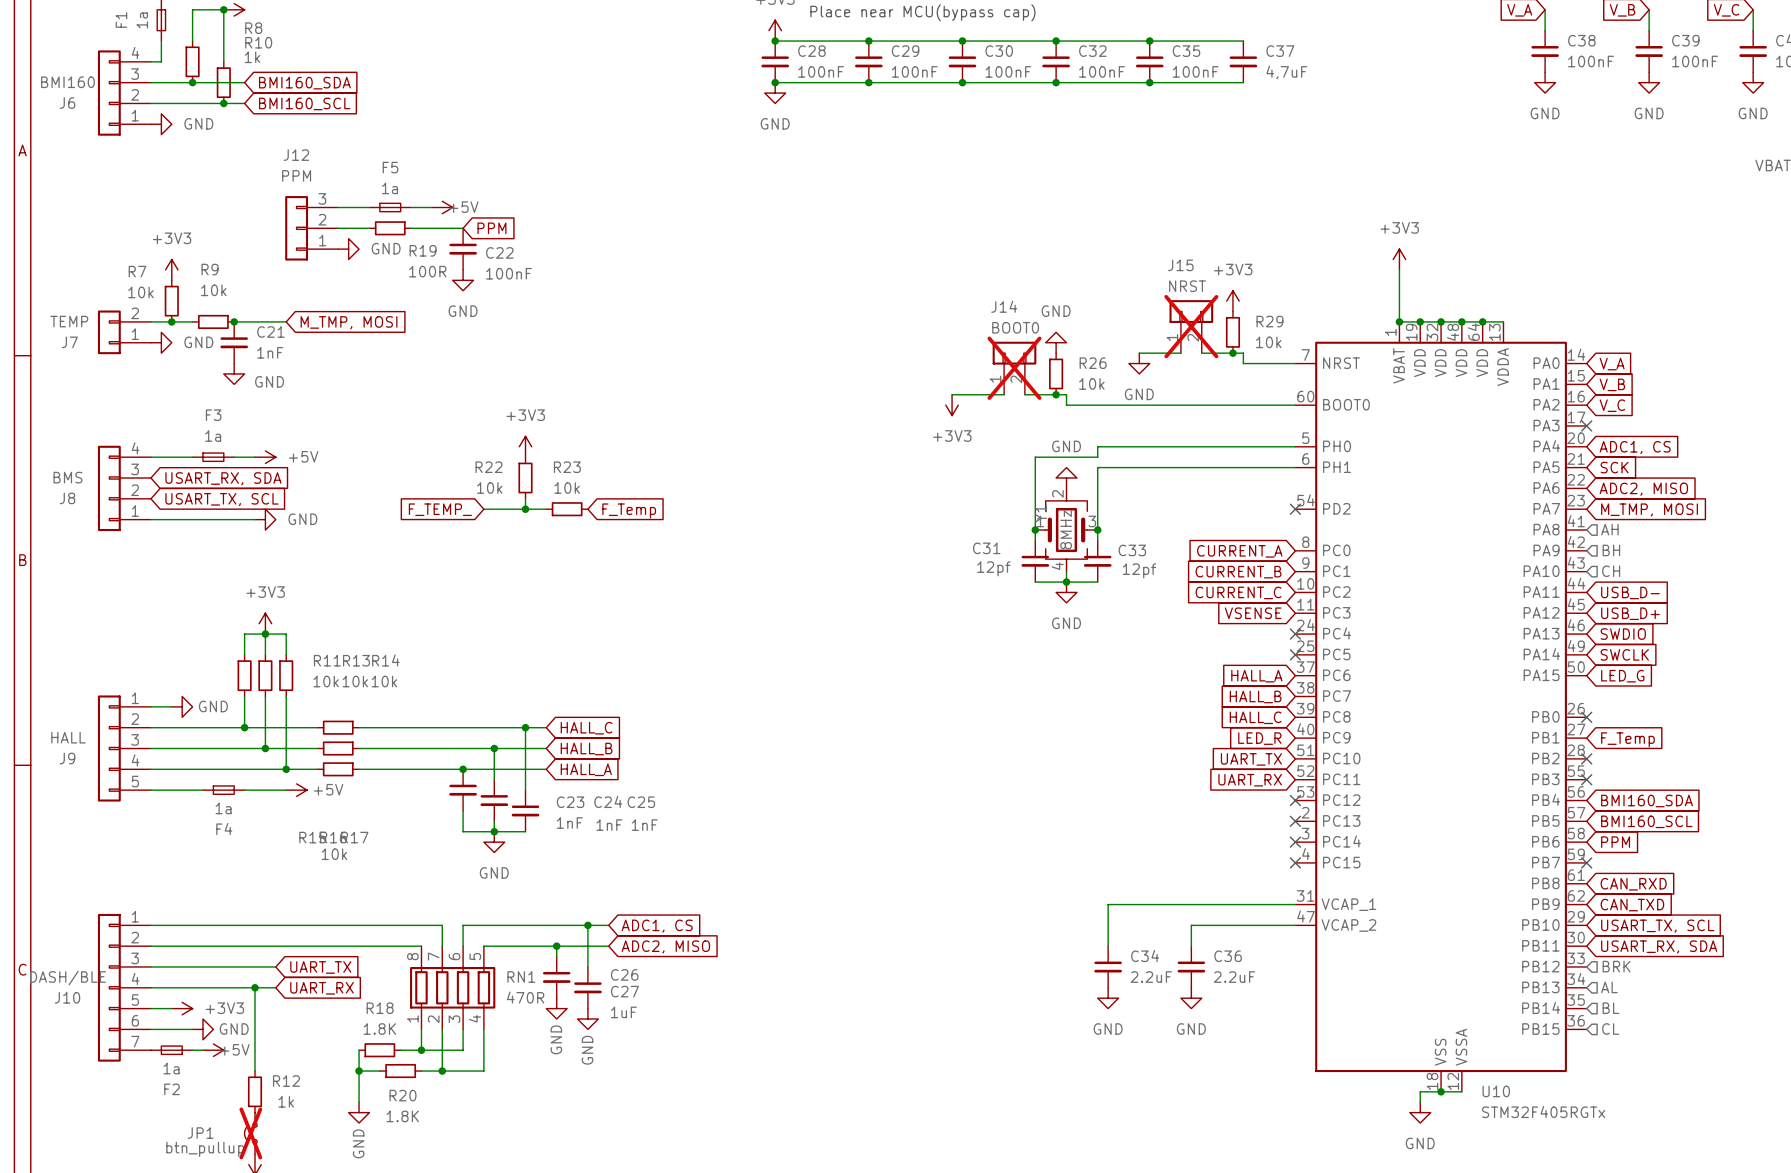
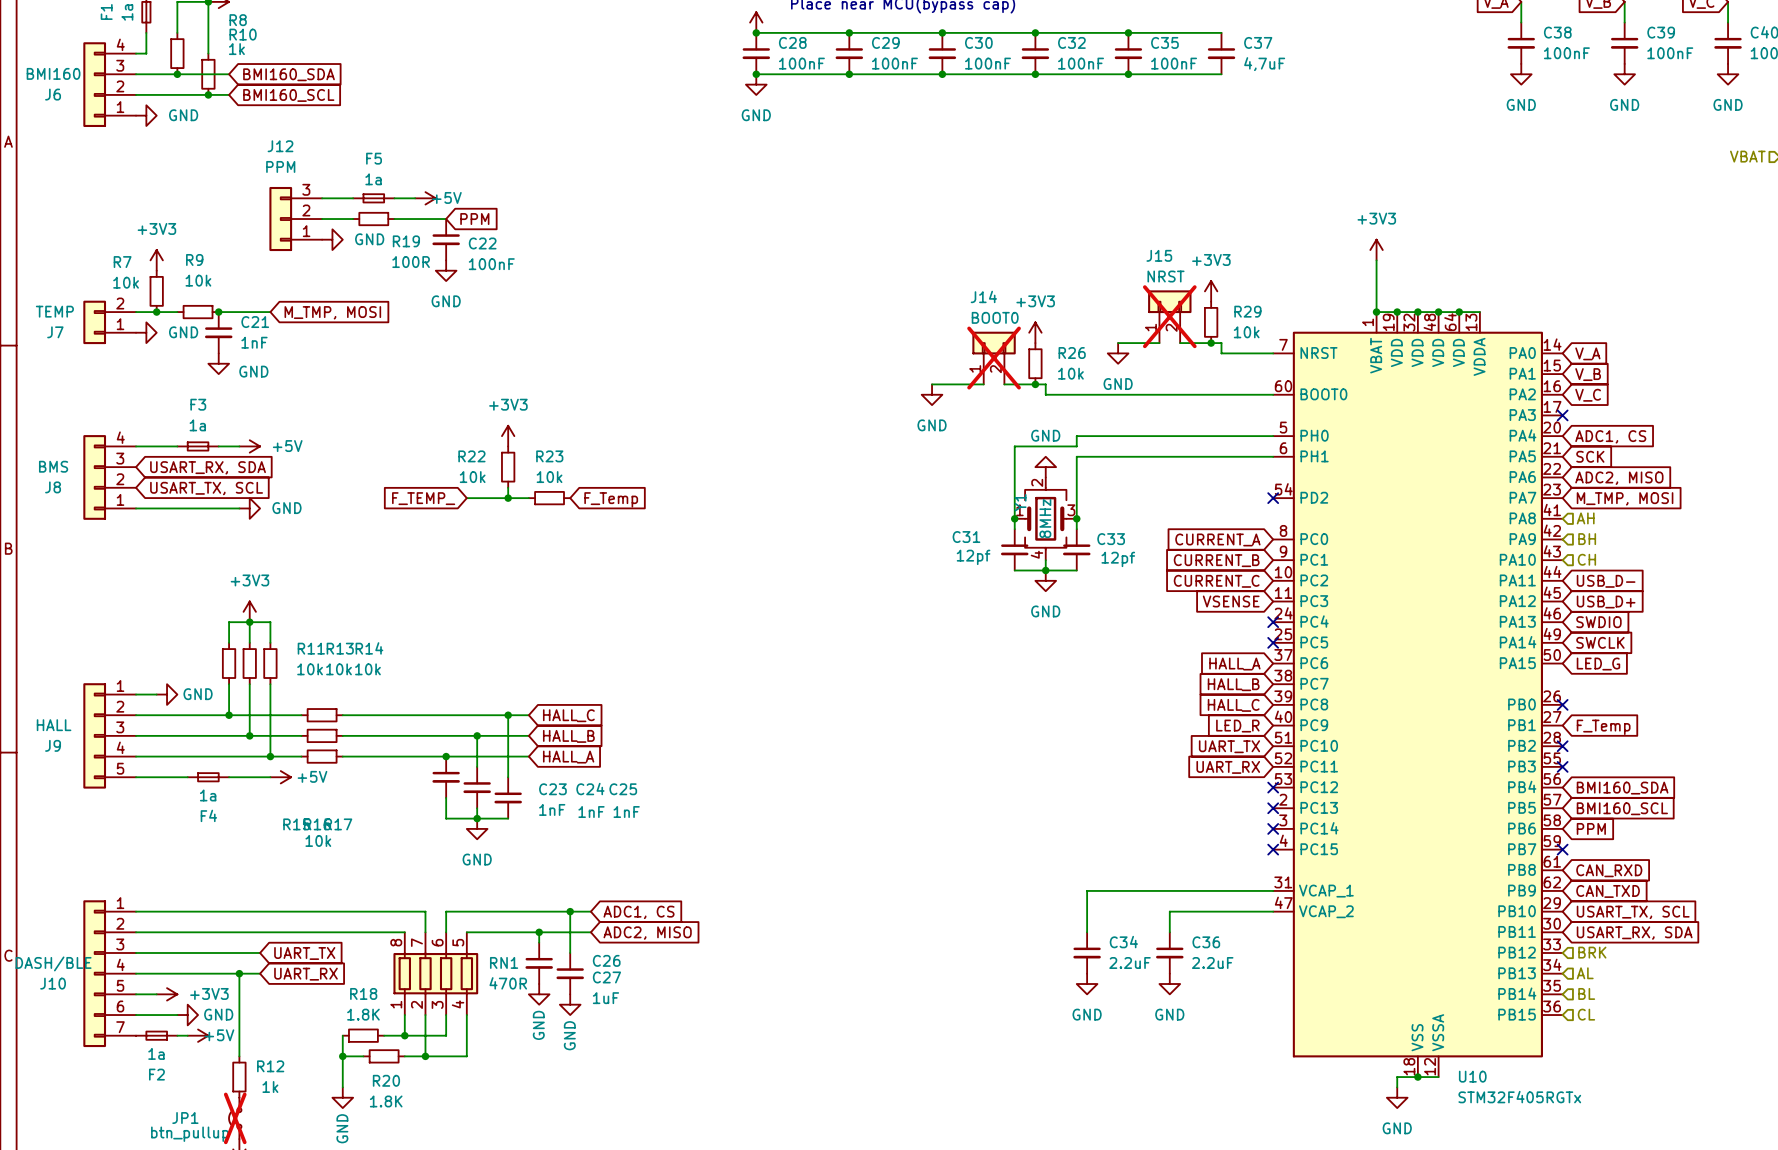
power symbol: GND (1056, 342) -> +3V3 (1035, 332)
power symbol: +3V3 (952, 405) -> GND (932, 394)

